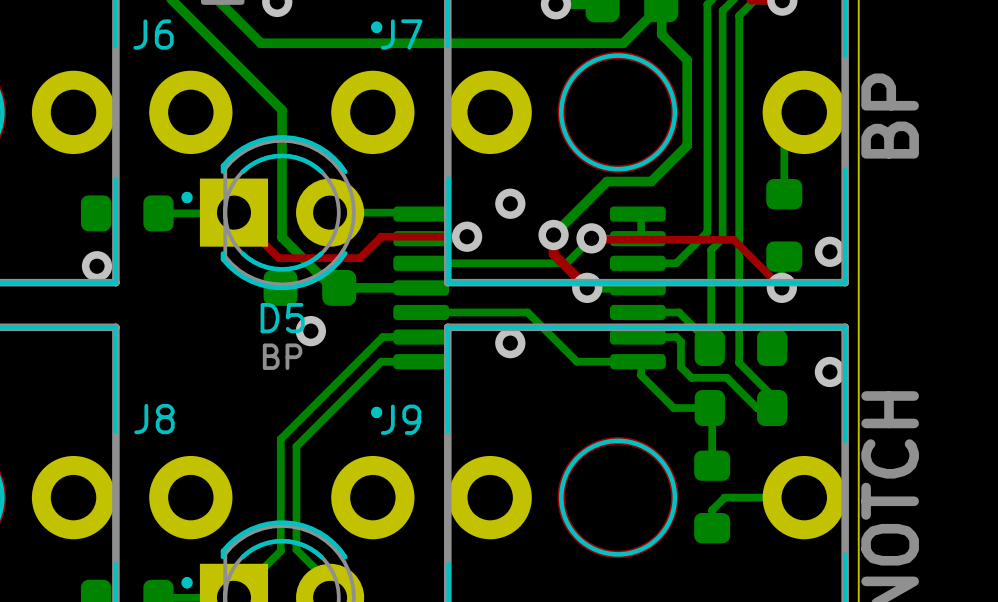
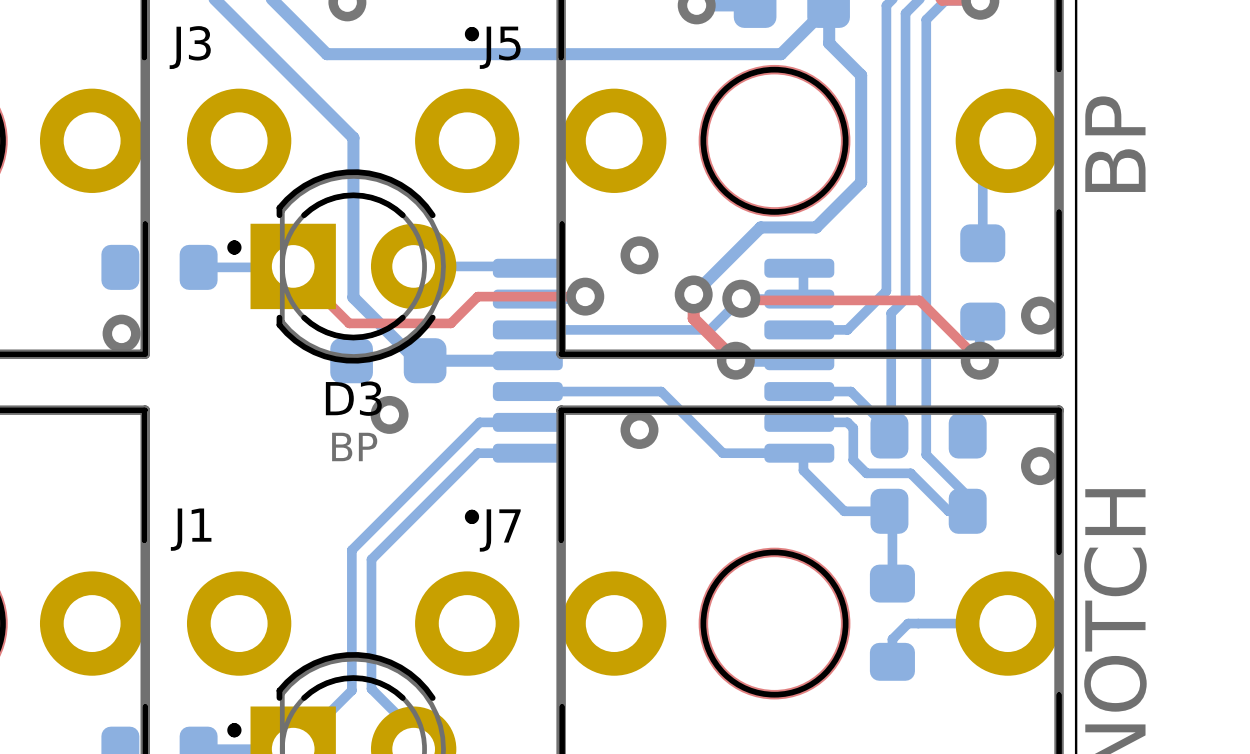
J6 name: J6 (153, 34) -> J3 (190, 47)
J7 name: J7 (401, 34) -> J5 (500, 47)
D5 name: D5 (282, 318) -> D3 (353, 398)
J8 name: J8 (154, 419) -> J1 (191, 529)
J9 name: J9 (401, 419) -> J7 (500, 530)

